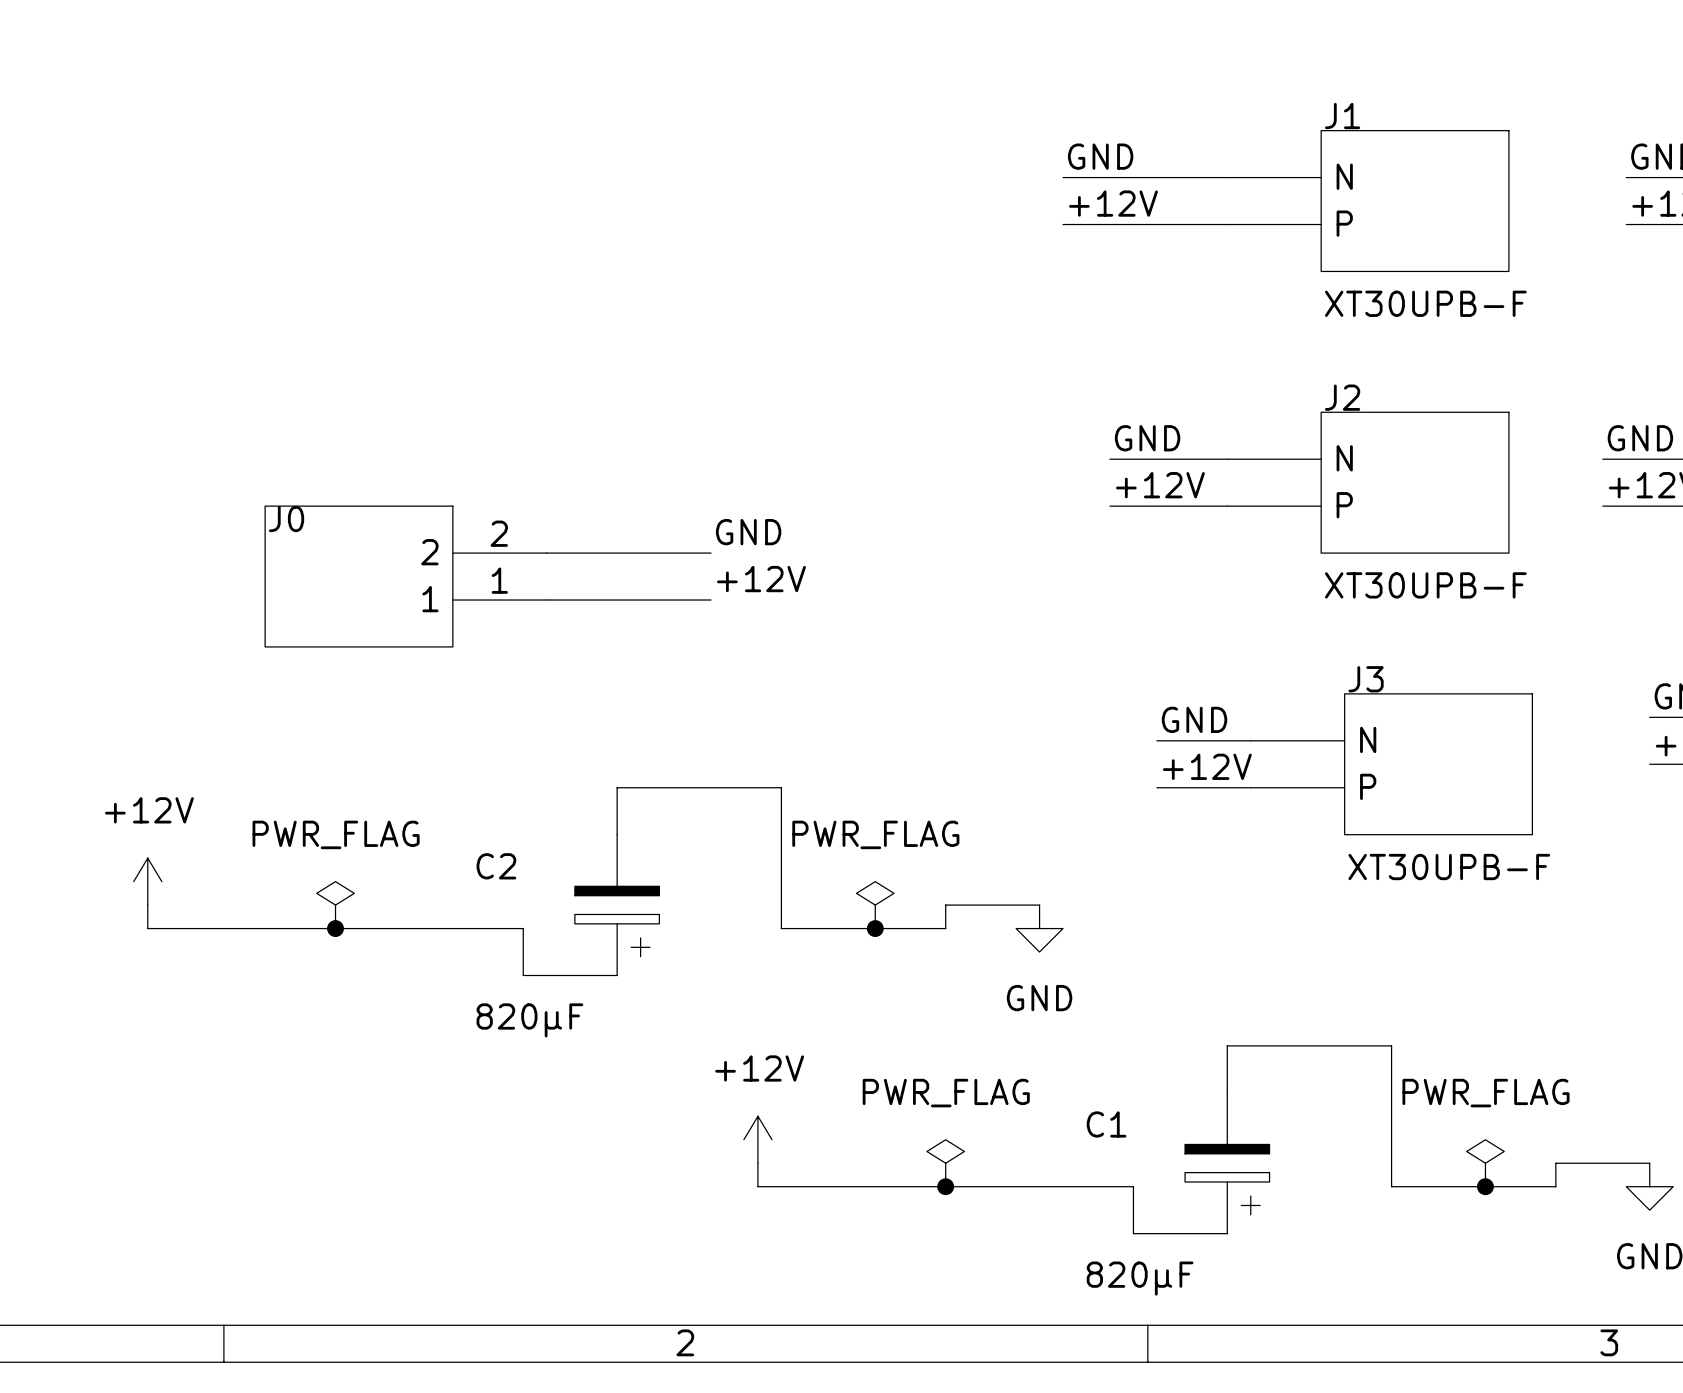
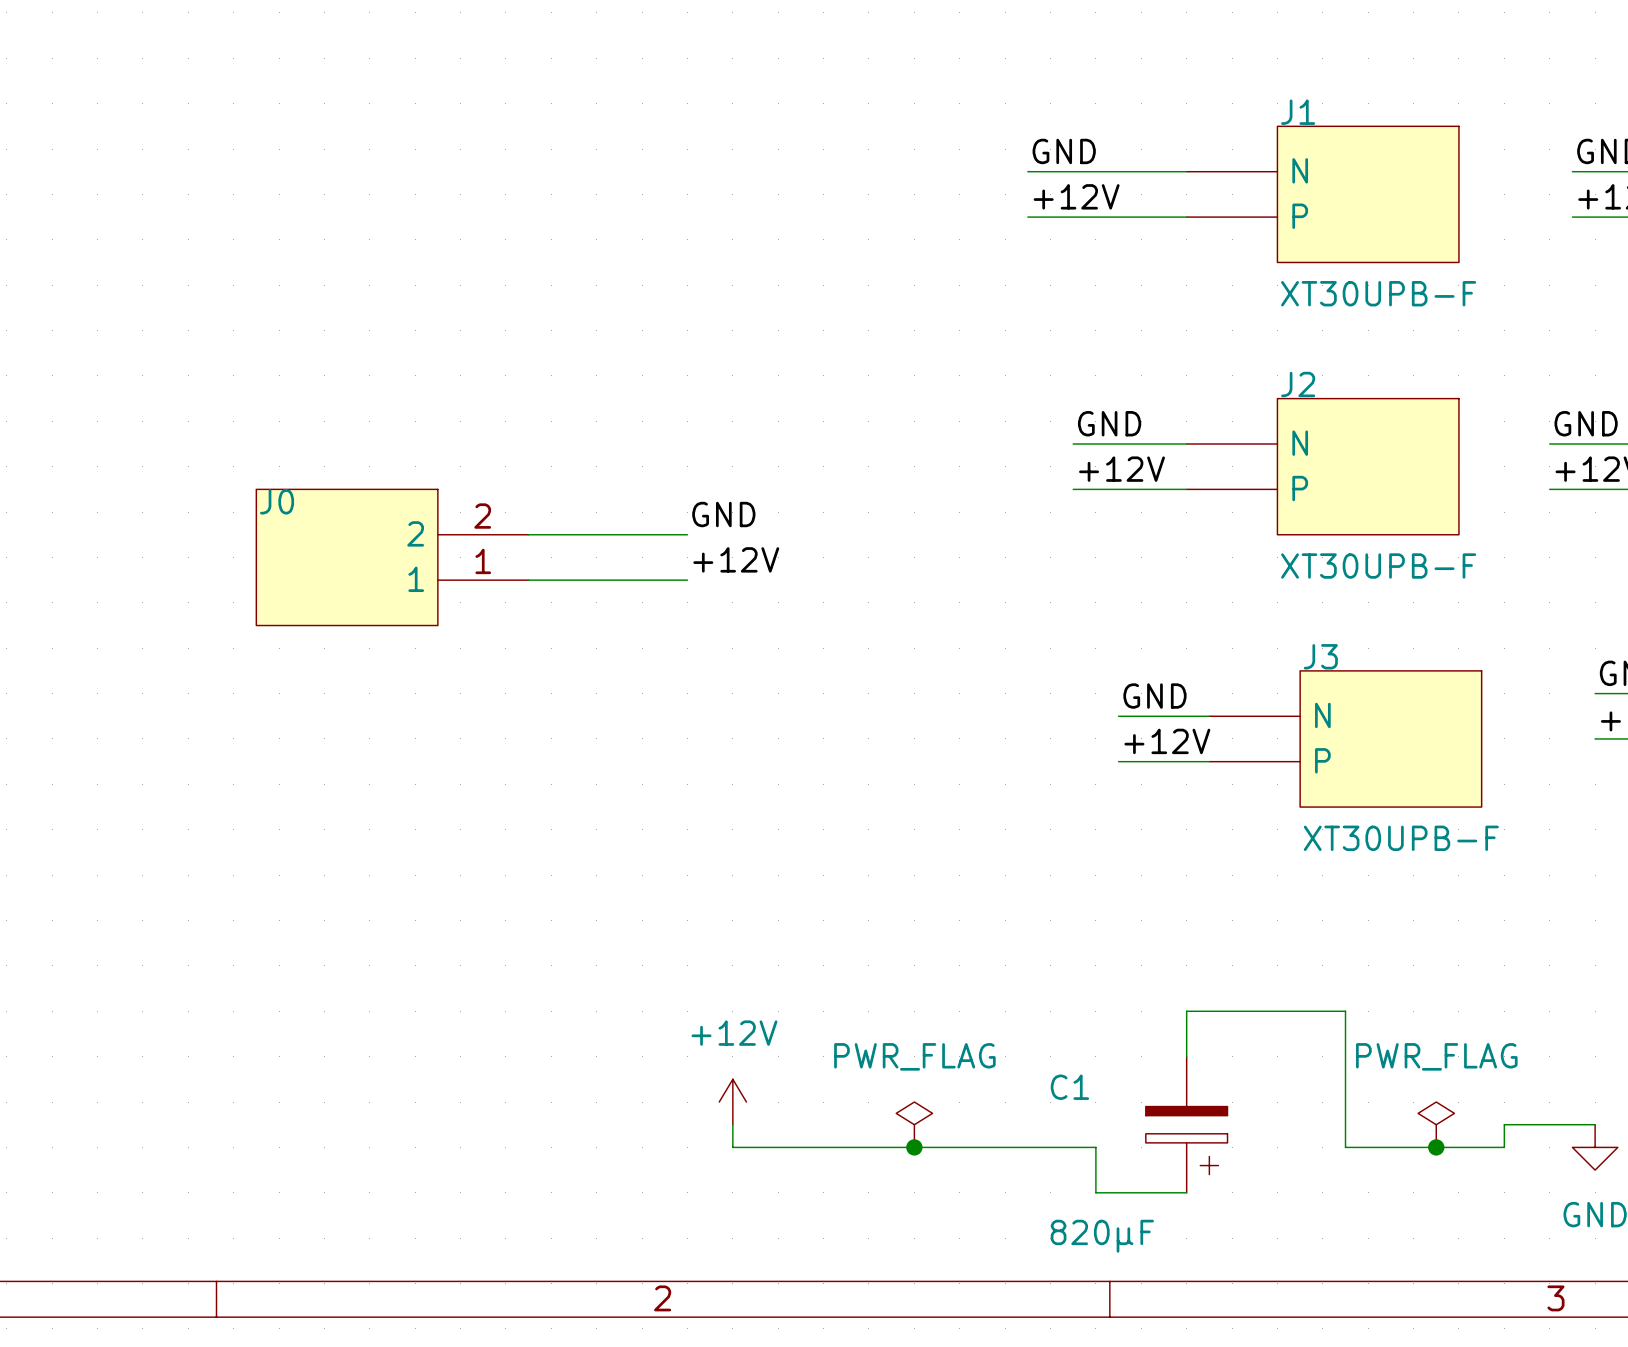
wire: (617, 834) (617, 787) (781, 787) (781, 928) (945, 928) (945, 905) (1039, 905) -> none
power symbol: +12V (147, 881) -> none
wire: (147, 905) (147, 928) (523, 928) (523, 975) (617, 975) -> none
power symbol: PWR_FLAG (335, 905) -> none
C2: 820µF (617, 905) -> none
power symbol: PWR_FLAG (875, 905) -> none
junction: (335, 928) -> none
junction: (875, 928) -> none
power symbol: GND (1039, 928) -> none

